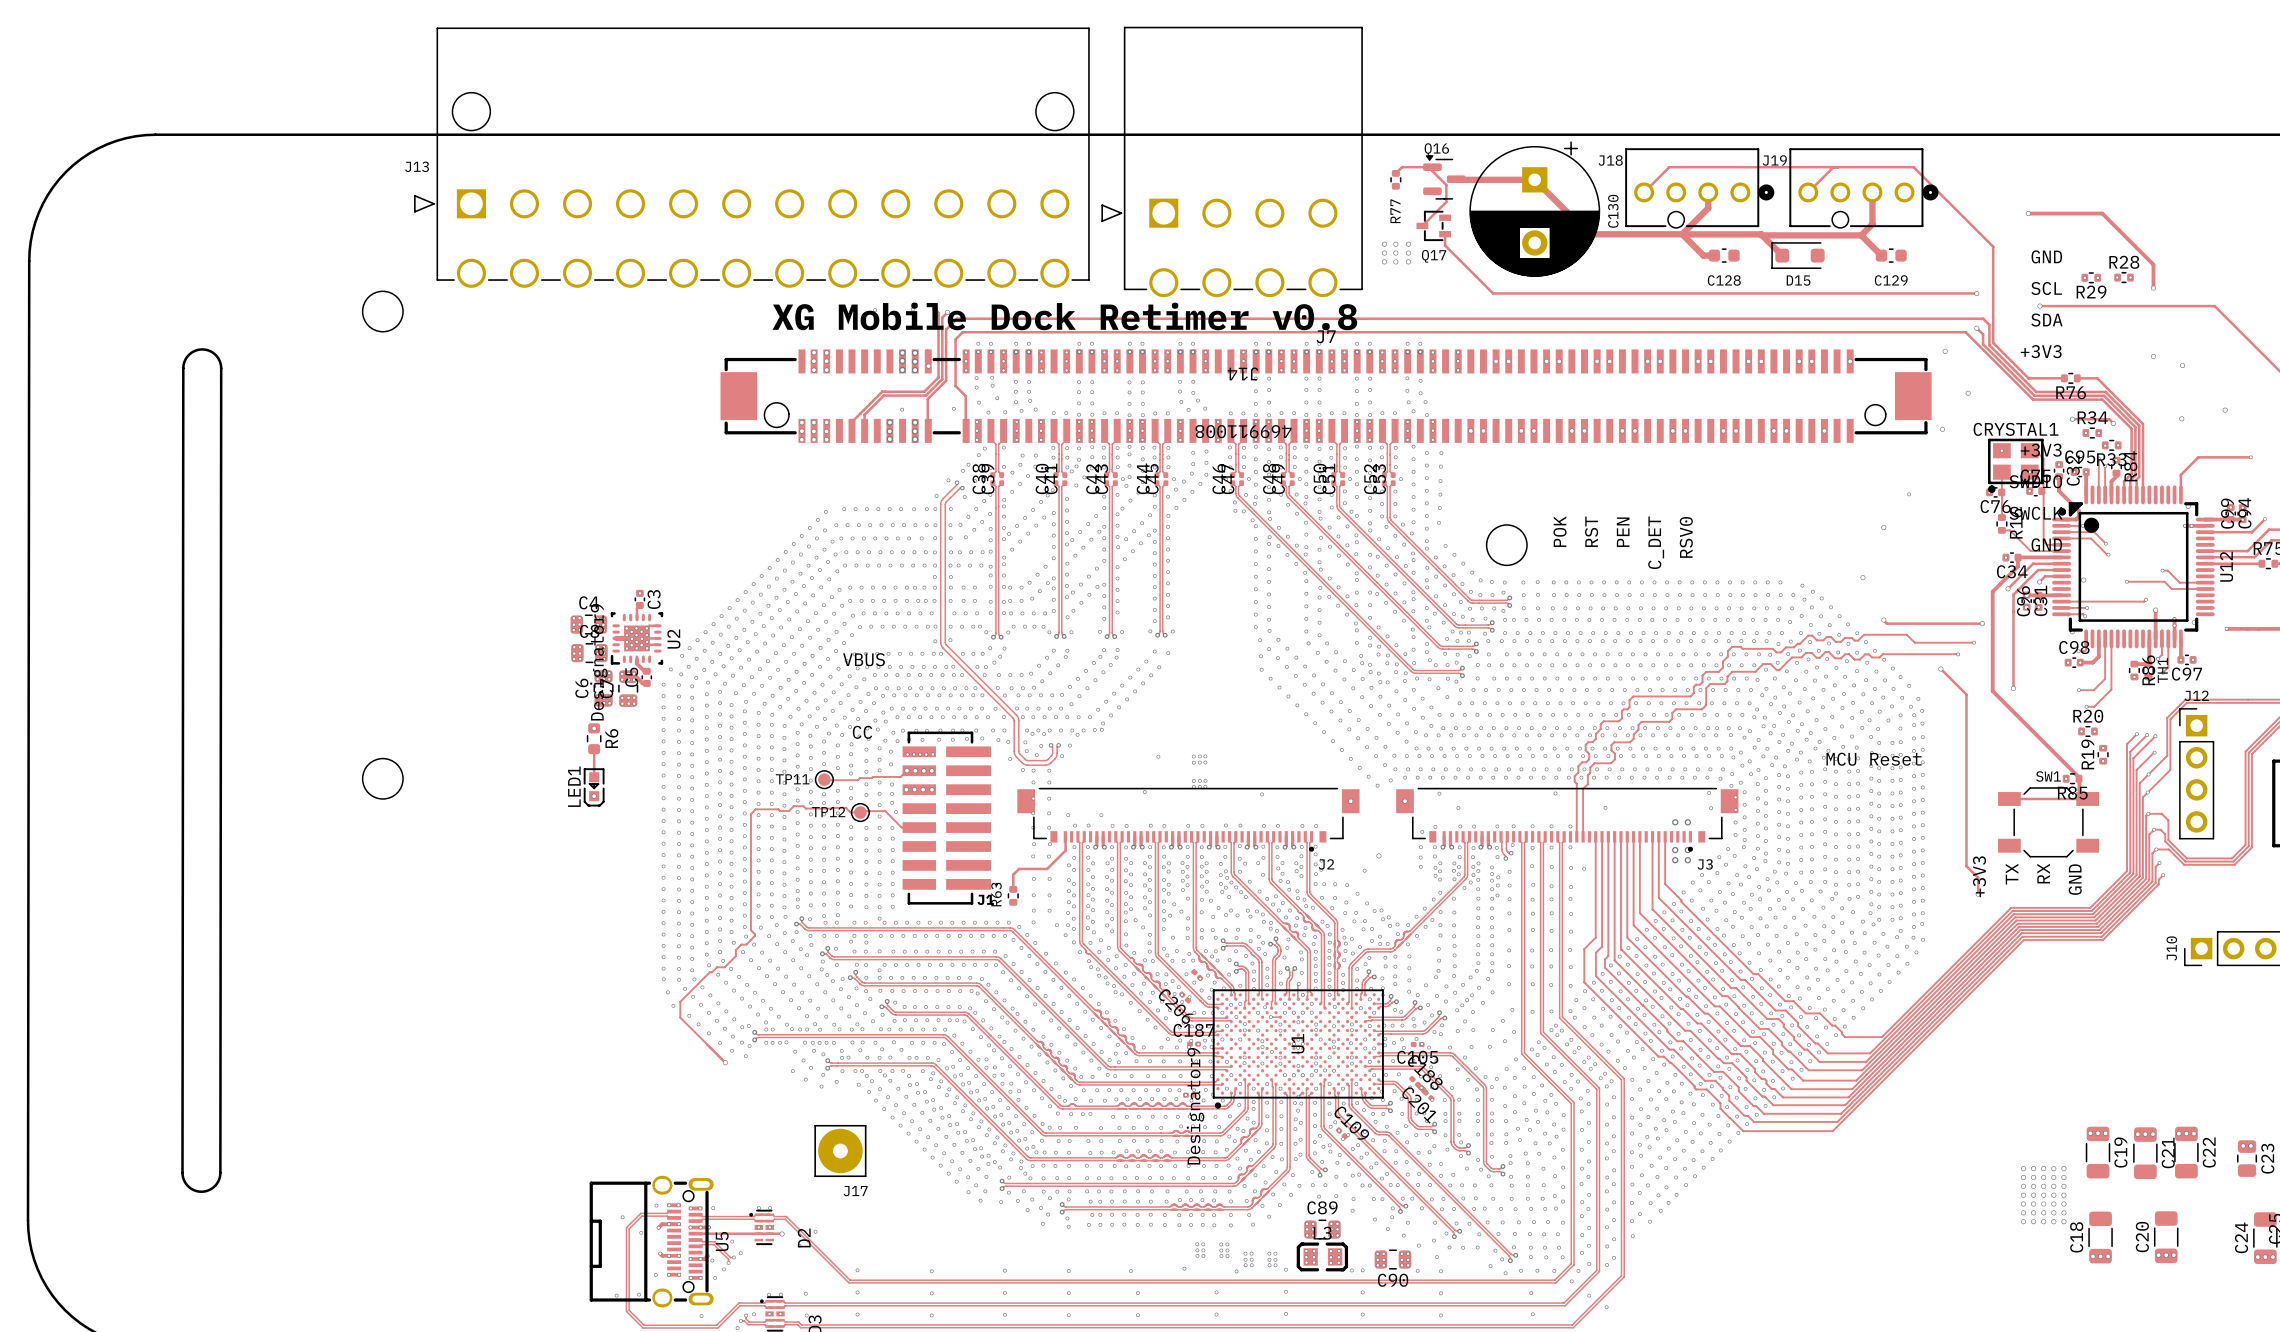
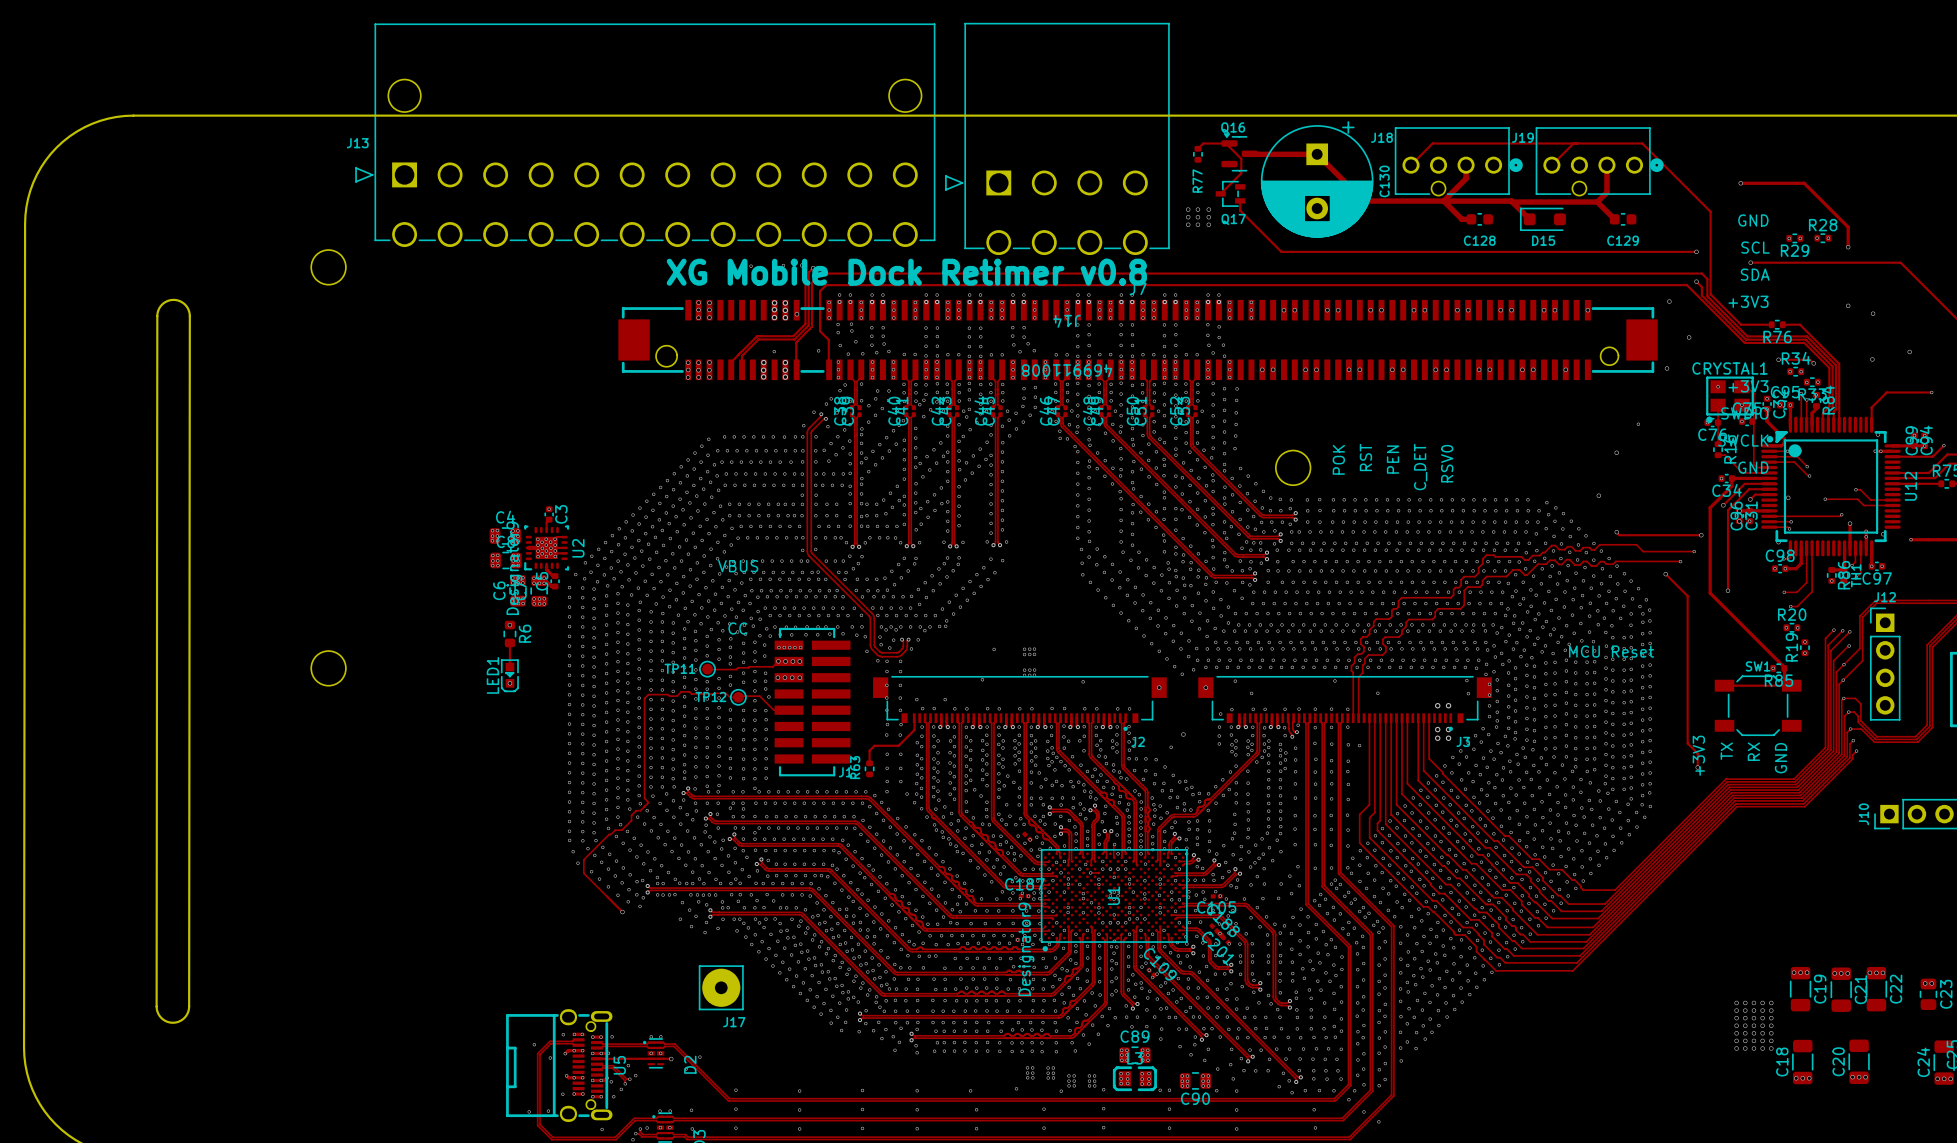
C206: (1185, 997) -> none

